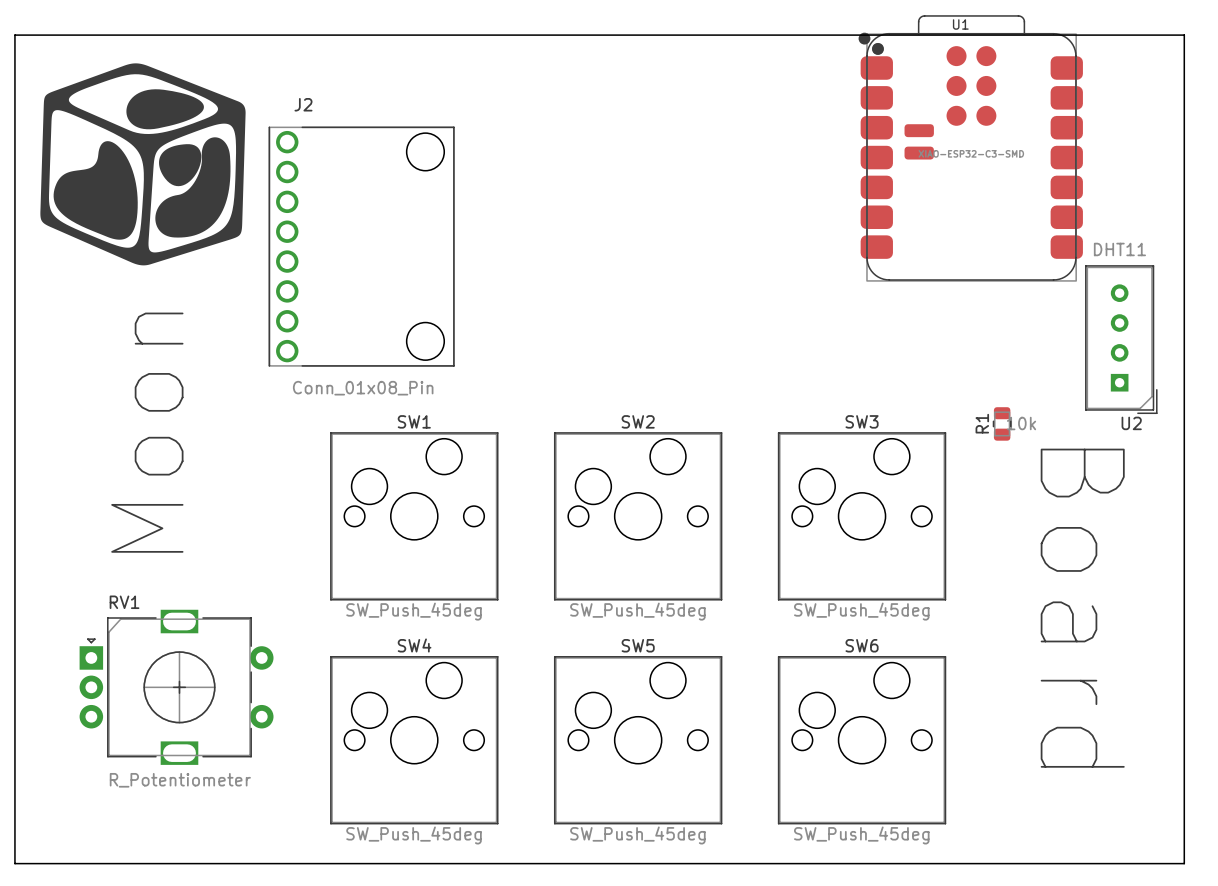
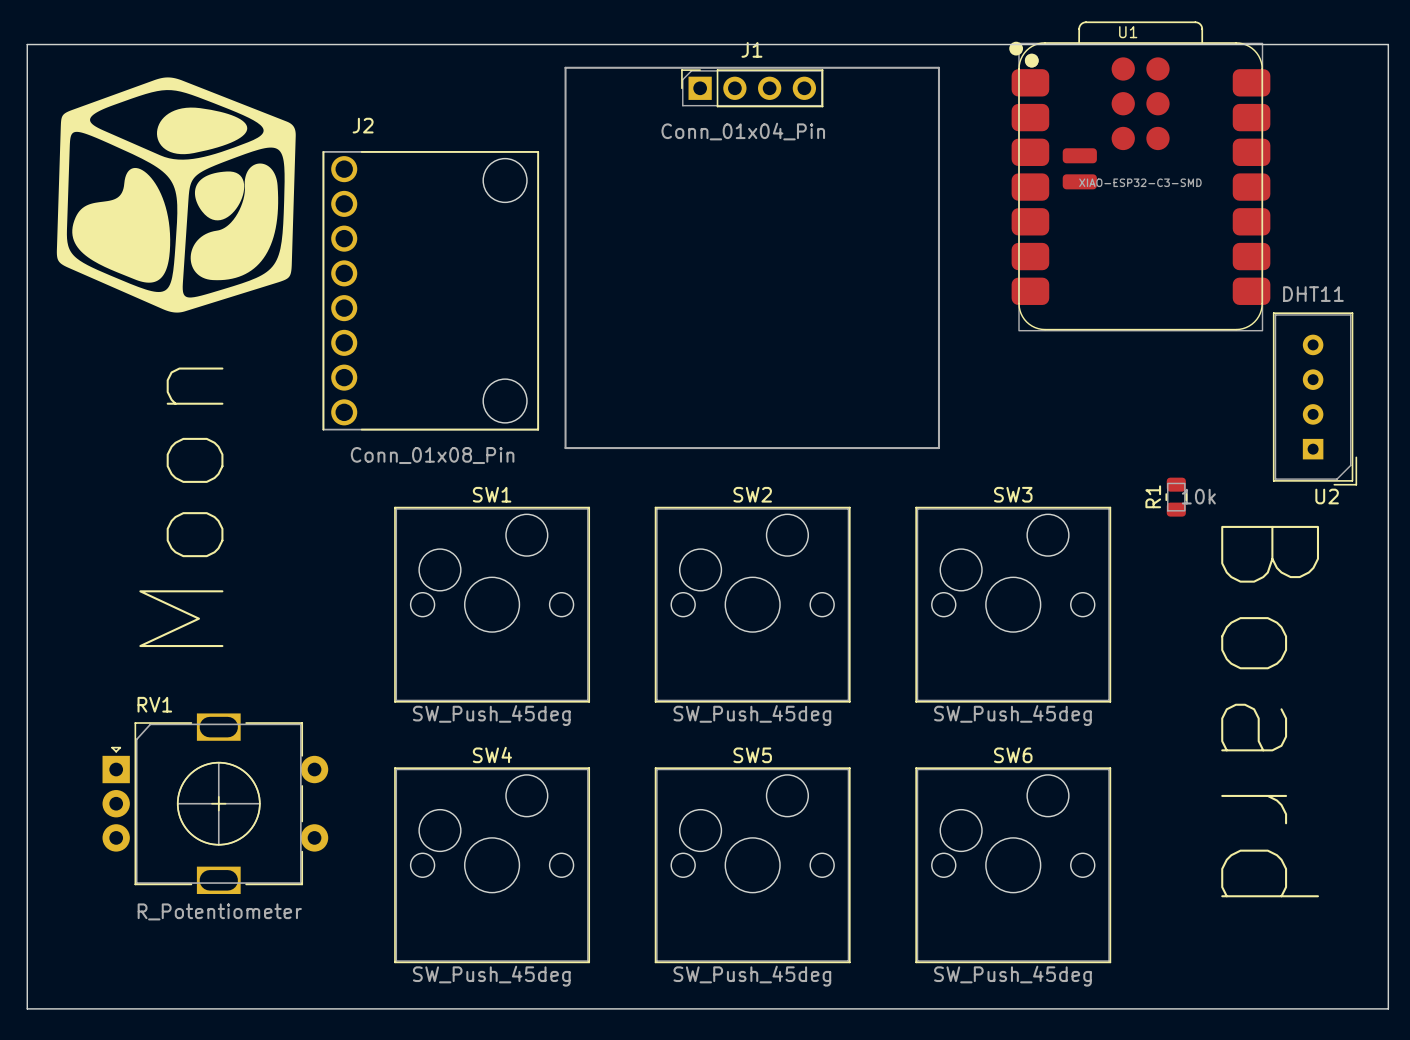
J1: none -> Conn_01x04_Pin (752, 257)

